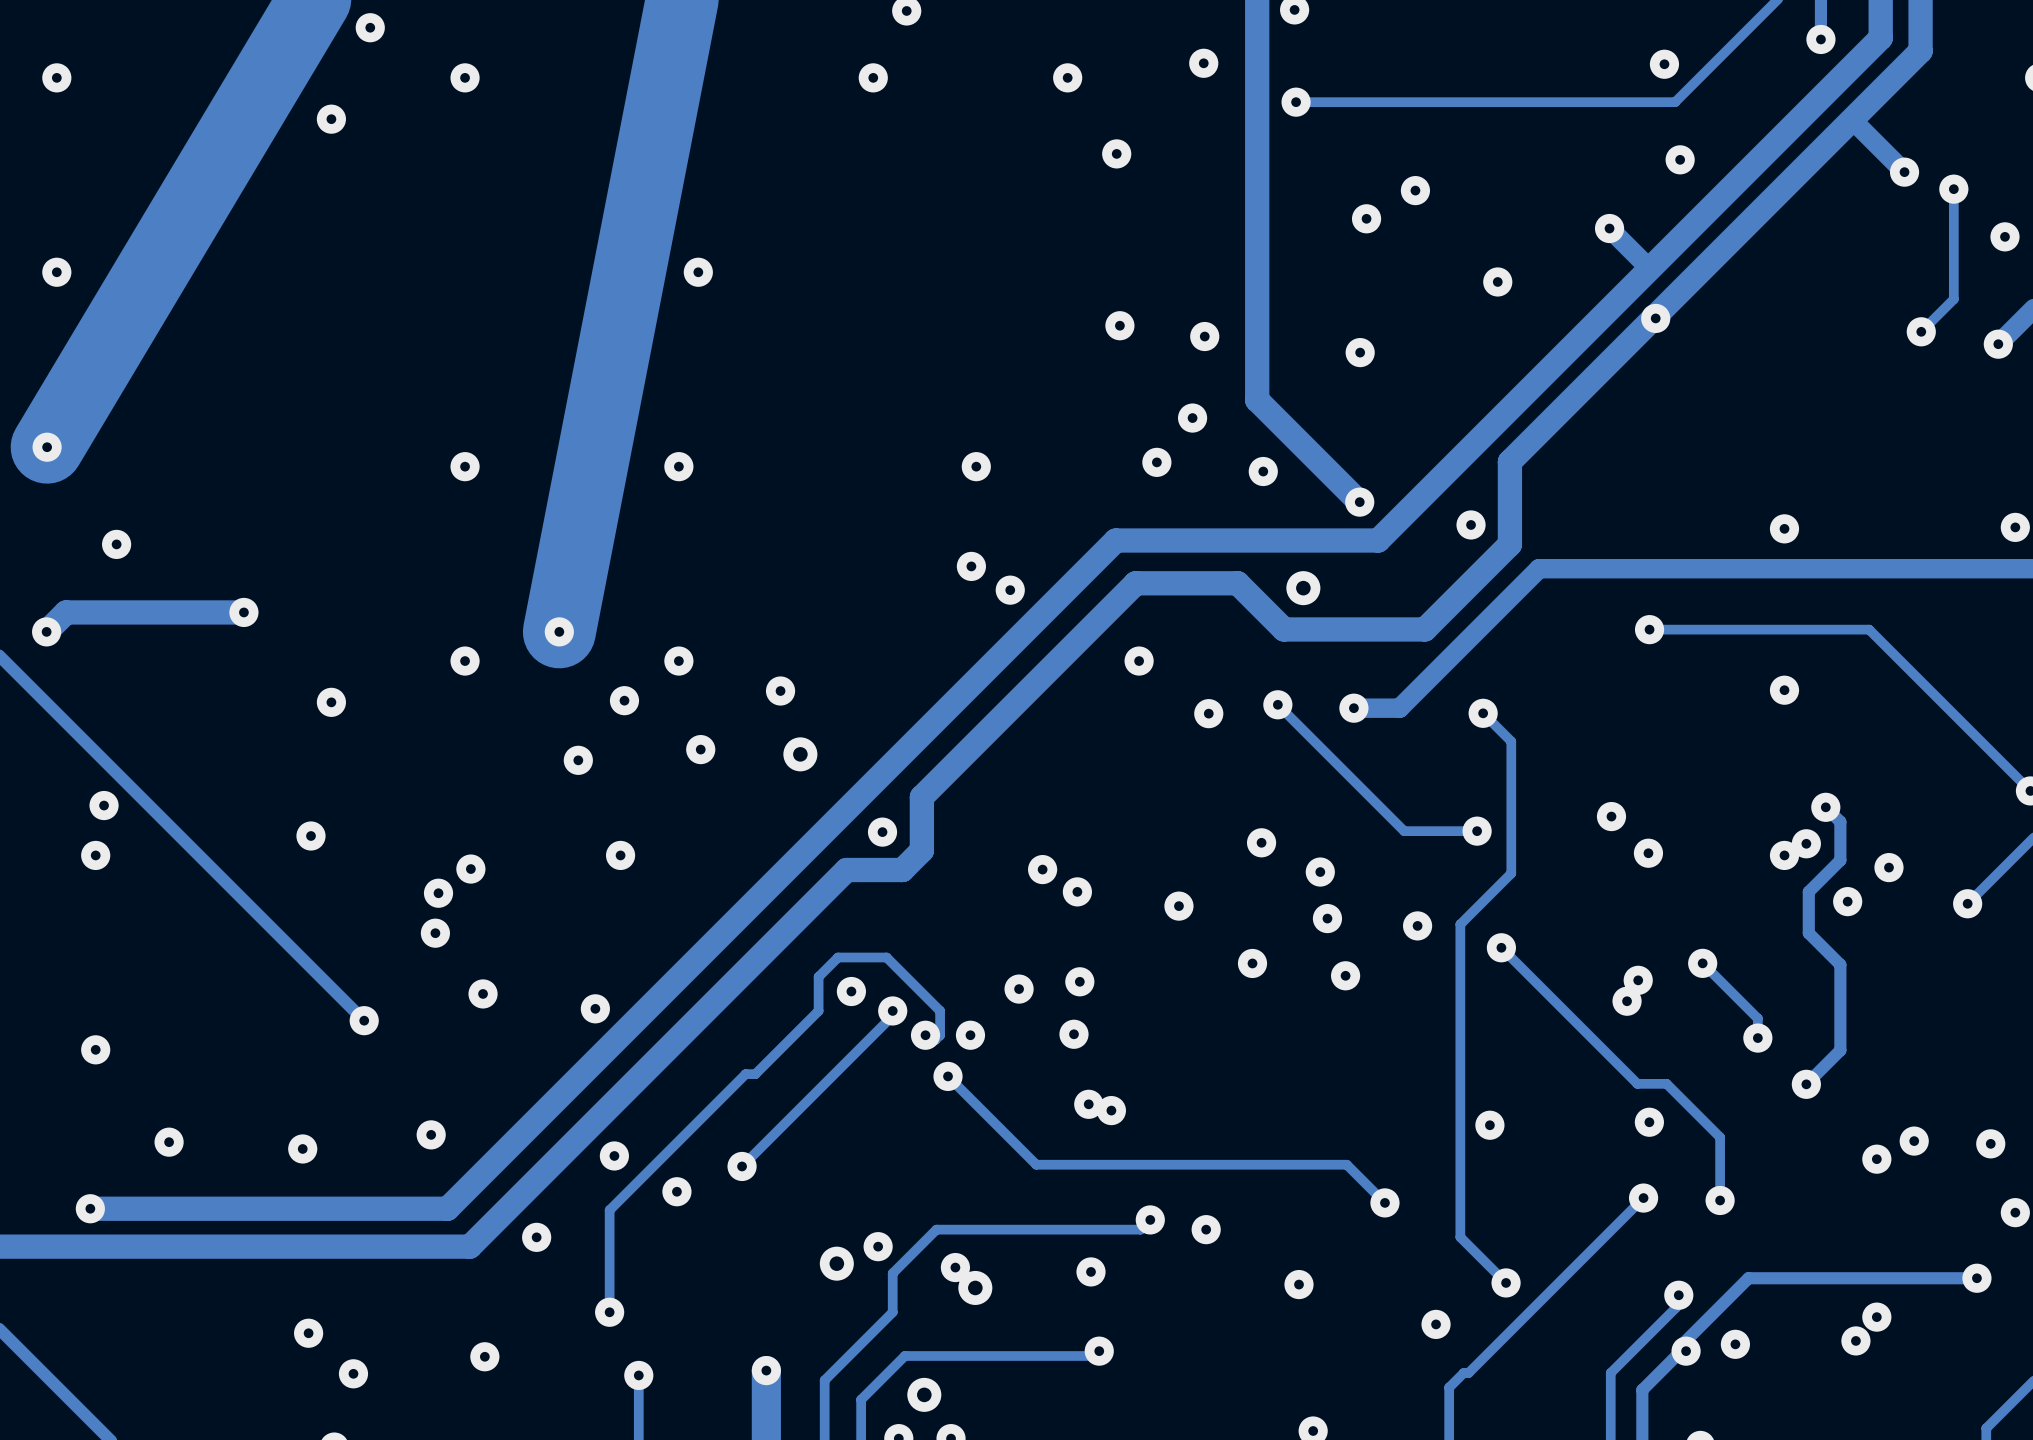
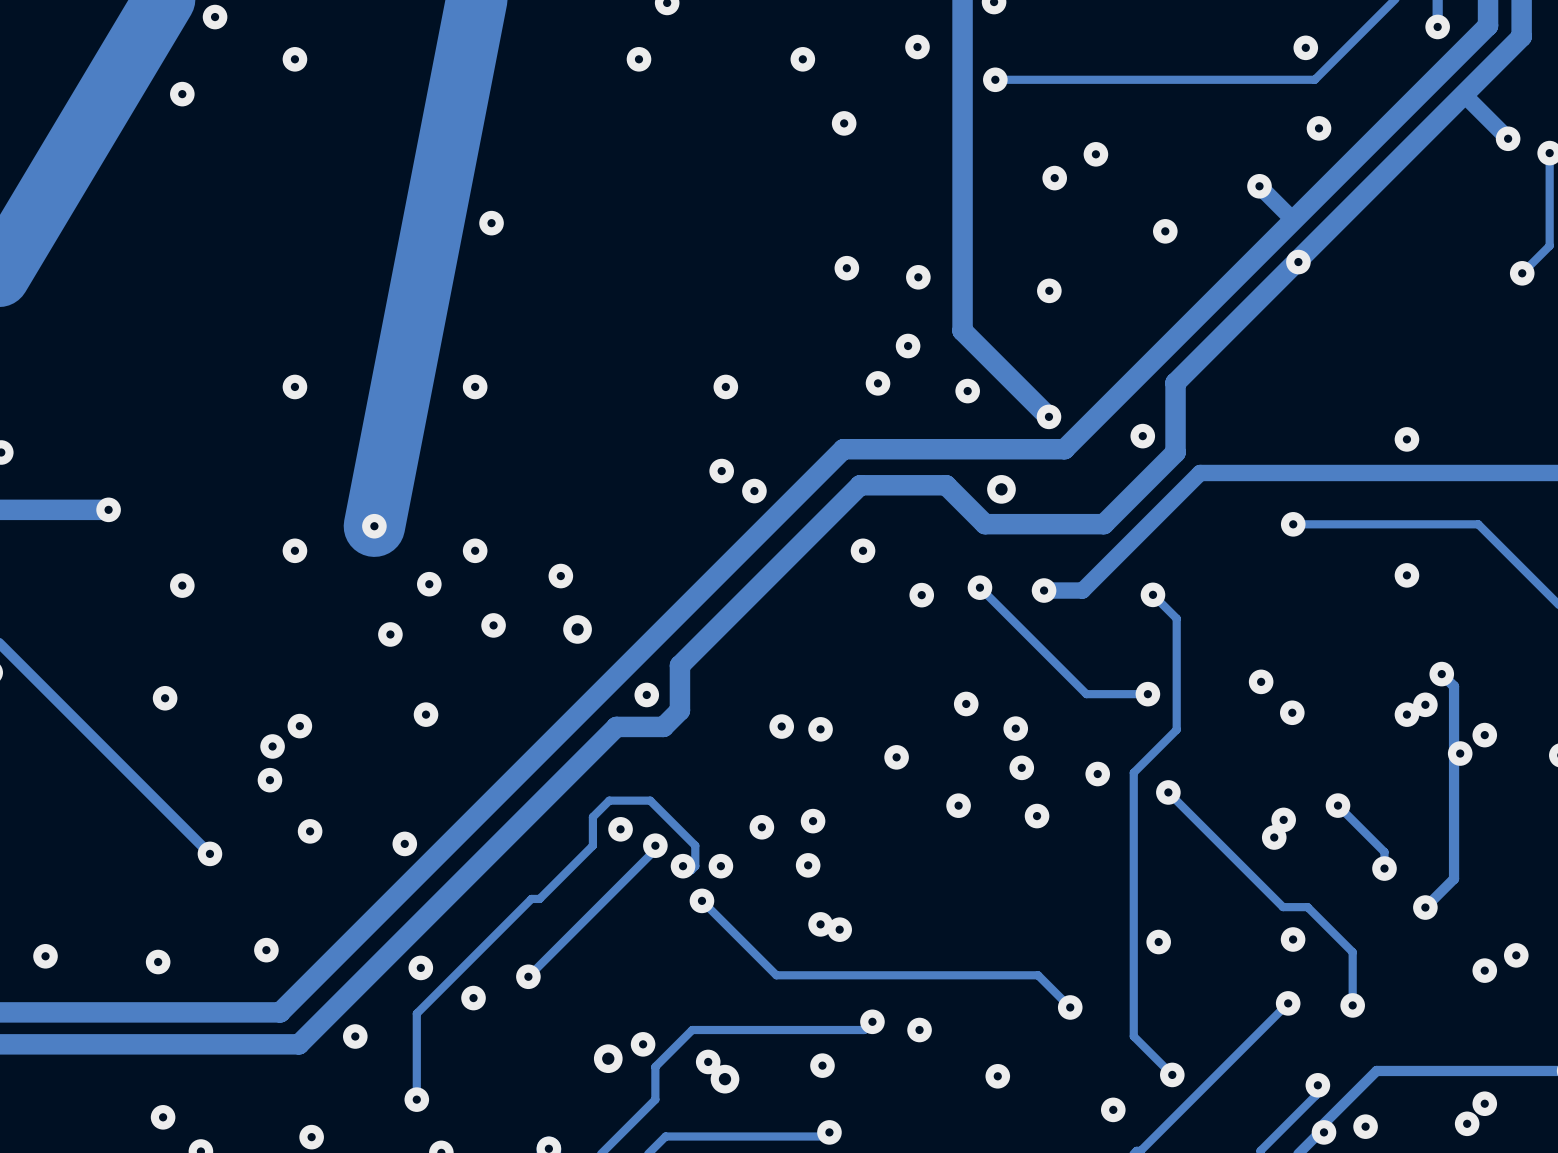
track: (1840, 860) (1808, 891) (1808, 933) (1840, 964) -> (1454, 718) (1454, 806)
via position: (1888, 867) -> (1484, 735)
via position: (1077, 891) -> (820, 729)

